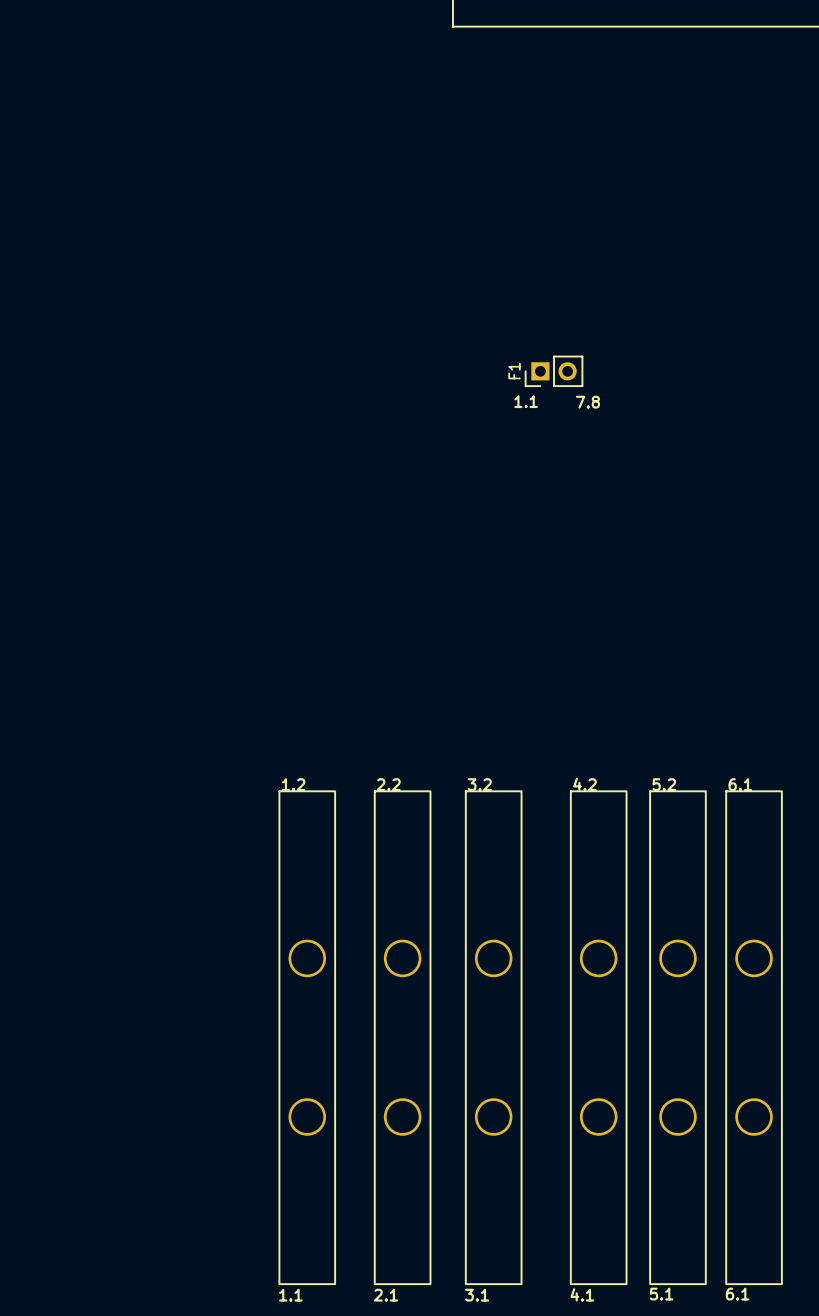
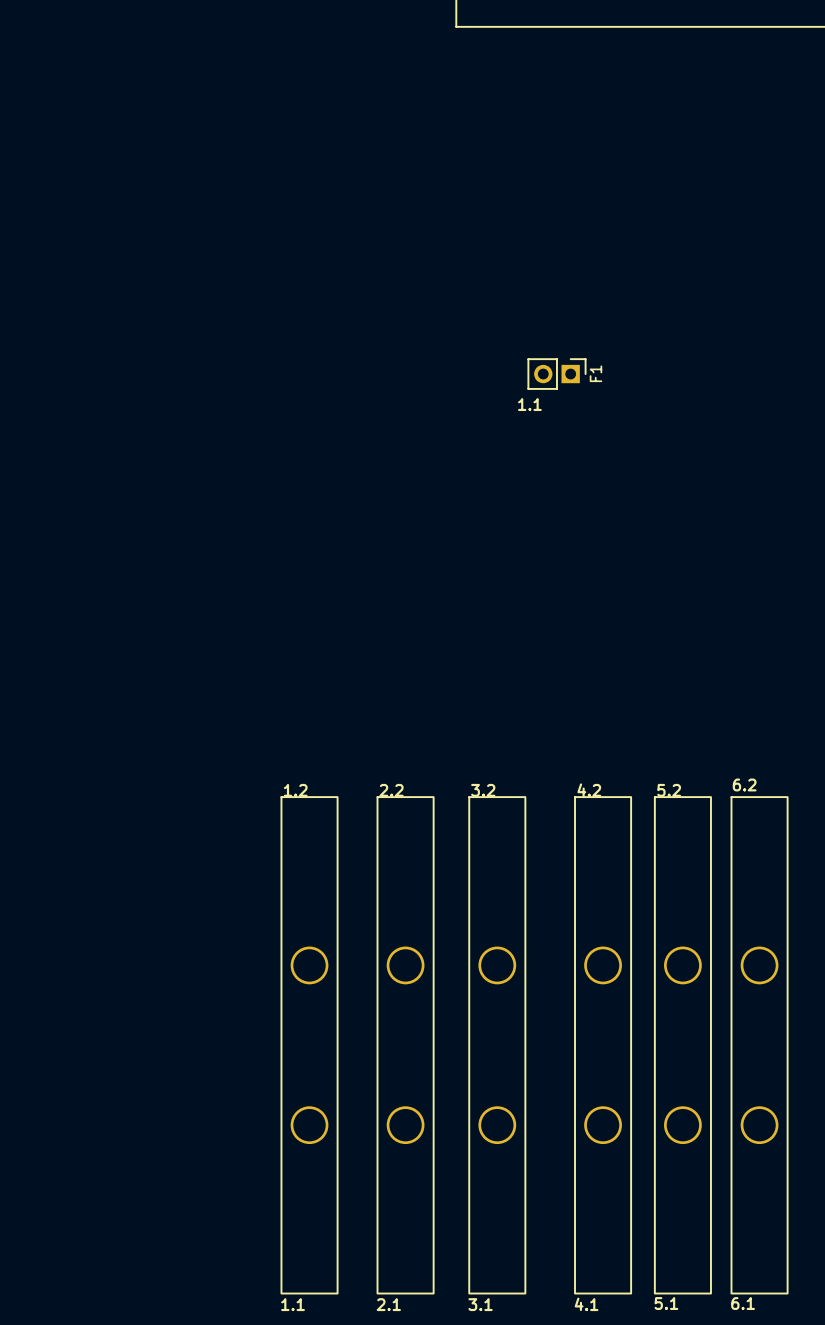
F1 rotation: 0° (554, 371) -> 180° (556, 374)
text: 7.8 (587, 402) -> none
text: 6.1 (740, 784) -> 6.2 (744, 784)

